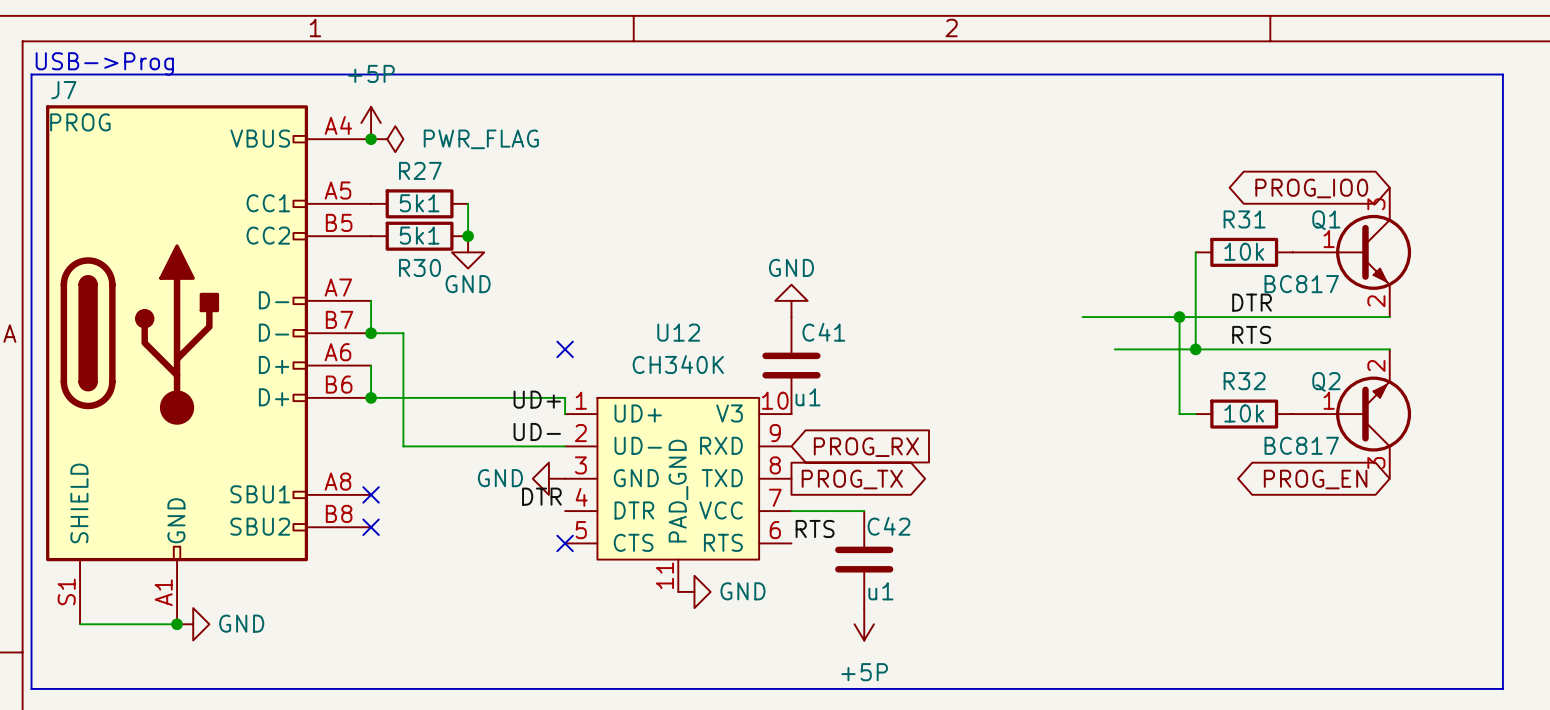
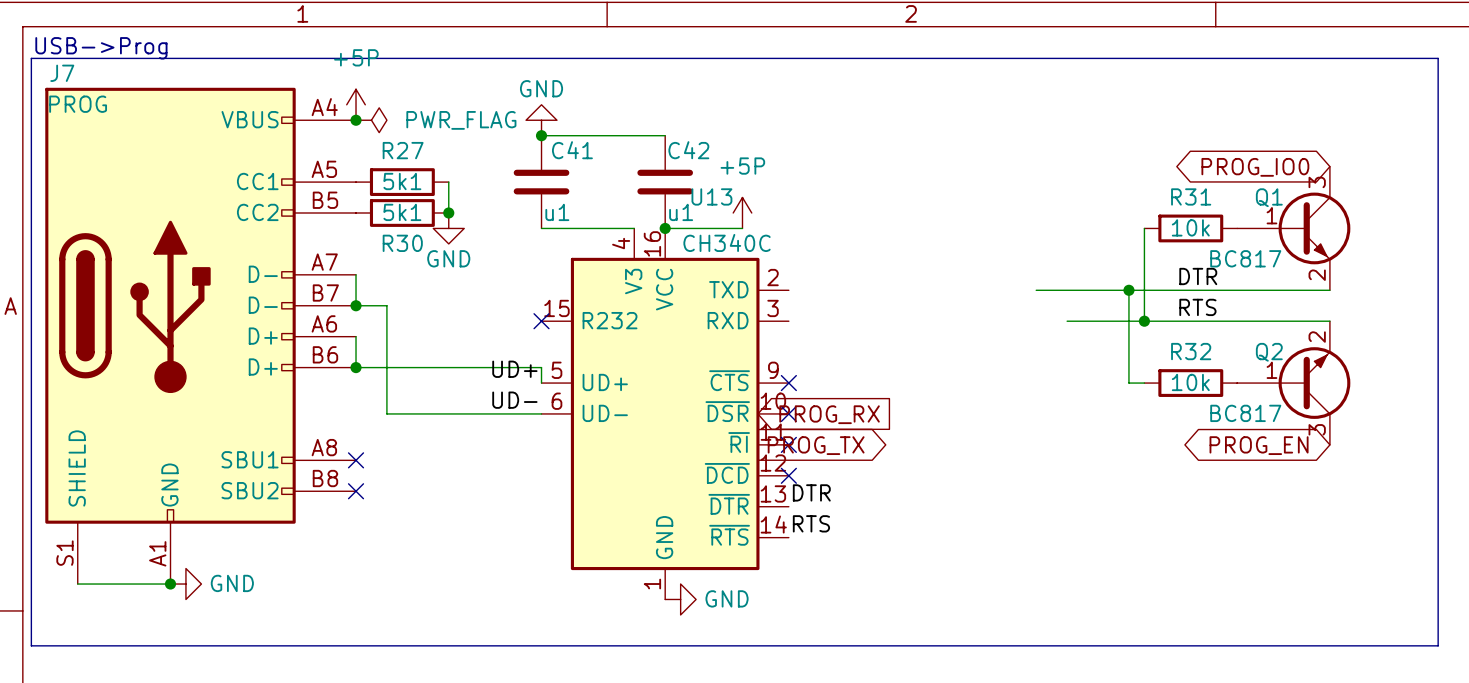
power symbol: none -> GND (541, 120)
wire: none -> (541, 135) (665, 135)
junction: none -> (541, 135)
power symbol: none -> +5P (742, 212)
wire: none -> (541, 228) (634, 228)
wire: none -> (665, 228) (742, 228)
junction: none -> (665, 228)
power symbol: GND (791, 300) -> none
C41 position: (791, 365) -> (541, 182)
no-connect mark: none -> (788, 383)
U13: none -> CH340C (665, 413)
no-connect mark: none -> (788, 413)
power symbol: GND (548, 478) -> none
no-connect mark: none -> (788, 444)
U12: CH340K (678, 494) -> none
label position: DTR (541, 496) -> DTR (811, 492)
wire: (791, 511) (864, 511) -> none
no-connect mark: none -> (788, 475)
label position: RTS (815, 528) -> RTS (811, 523)
no-connect mark: (565, 543) -> none
C42 position: (864, 559) -> (665, 182)
power symbol position: GND (694, 591) -> GND (680, 599)
power symbol: +5P (864, 624) -> none

